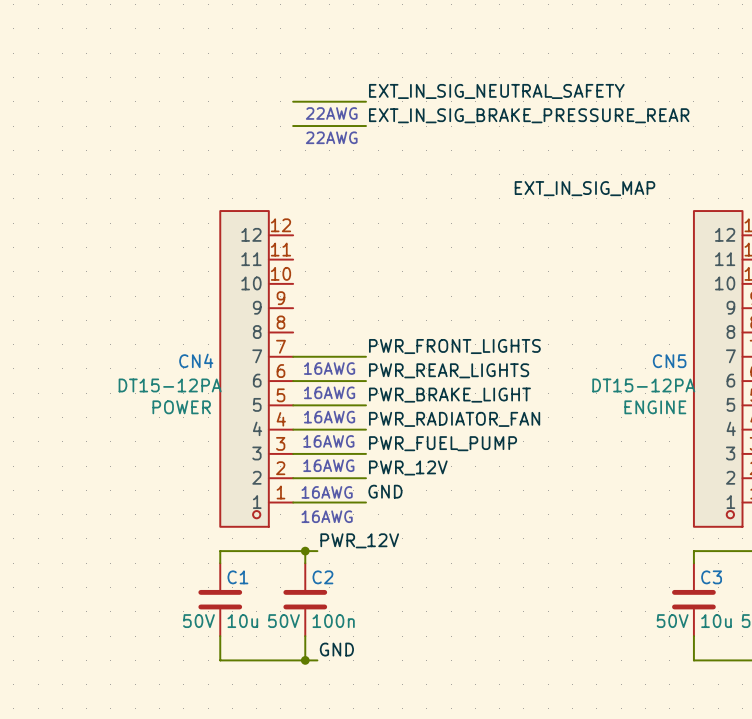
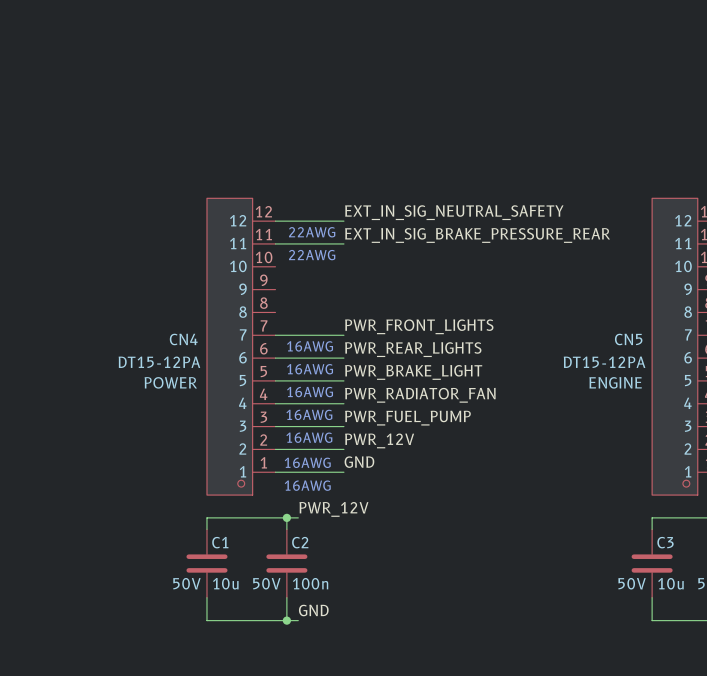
label position: EXT_IN_SIG_NEUTRAL_SAFETY (496, 91) -> EXT_IN_SIG_NEUTRAL_SAFETY (454, 212)
wire: (293, 101) (366, 101) -> (275, 243) (343, 243)
text: 22AWG (331, 113) -> none
label position: EXT_IN_SIG_BRAKE_PRESSURE_REAR (529, 115) -> EXT_IN_SIG_BRAKE_PRESSURE_REAR (477, 235)
wire: (293, 126) (366, 126) -> (275, 221) (343, 221)
text: 22AWG (331, 137) -> none
label: EXT_IN_SIG_MAP (585, 188) -> none
text: none -> 22AWG (312, 232)
text: none -> 22AWG (312, 255)

